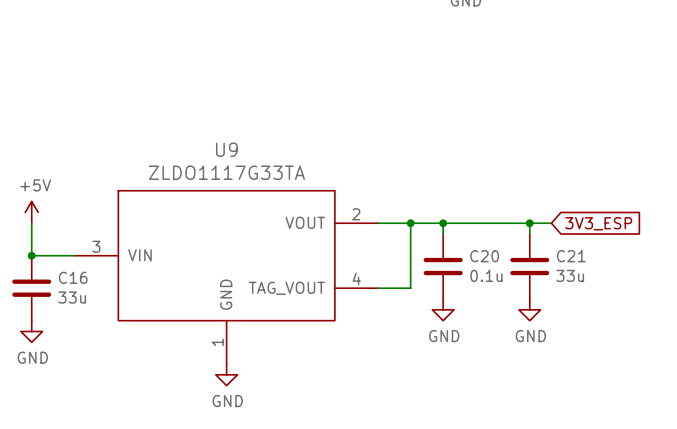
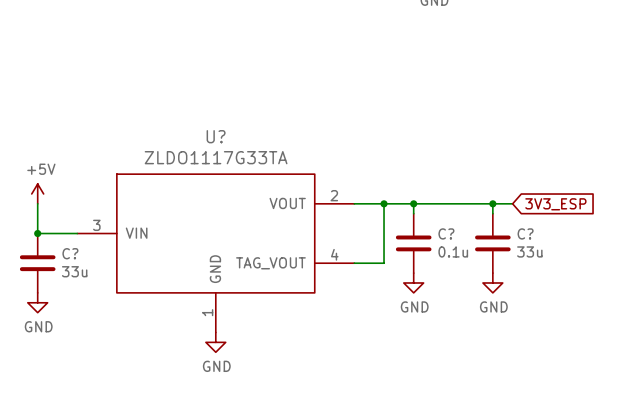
U9 name: U9 (226, 149) -> U? (216, 136)
C20 name: C20 (484, 256) -> C? (446, 233)
C21 name: C21 (571, 256) -> C? (525, 233)
C16 name: C16 (73, 277) -> C? (70, 253)

